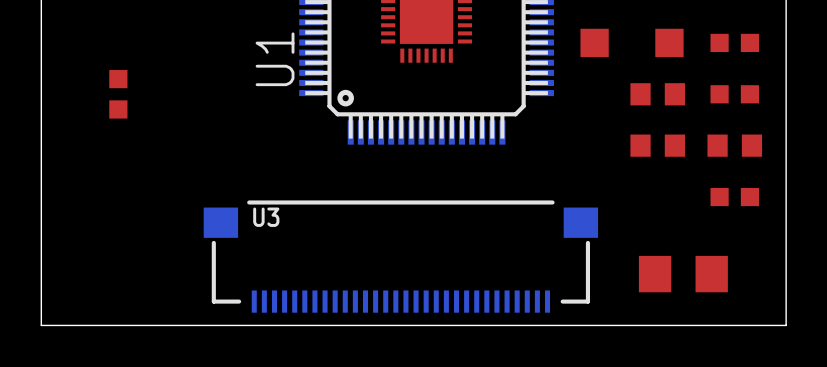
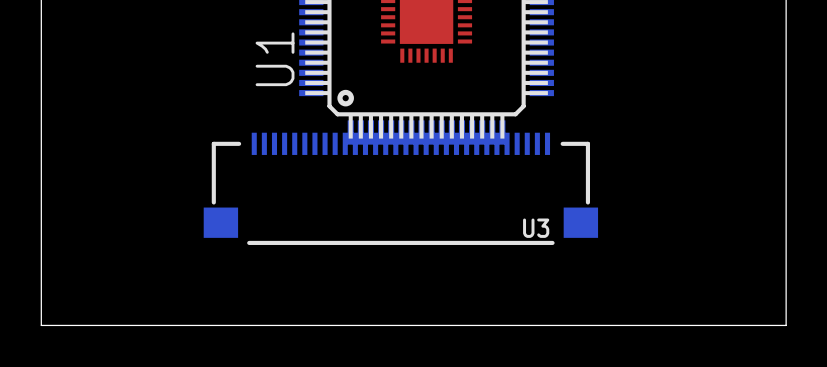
part: (632, 42) -> none
part: (734, 42) -> none
part: (118, 94) -> none
part: (657, 94) -> none
part: (734, 94) -> none
part: (657, 145) -> none
part: (734, 145) -> none
part: (734, 197) -> none
U3 rotation: 0° (400, 256) -> 180° (400, 188)
part: (683, 274) -> none

